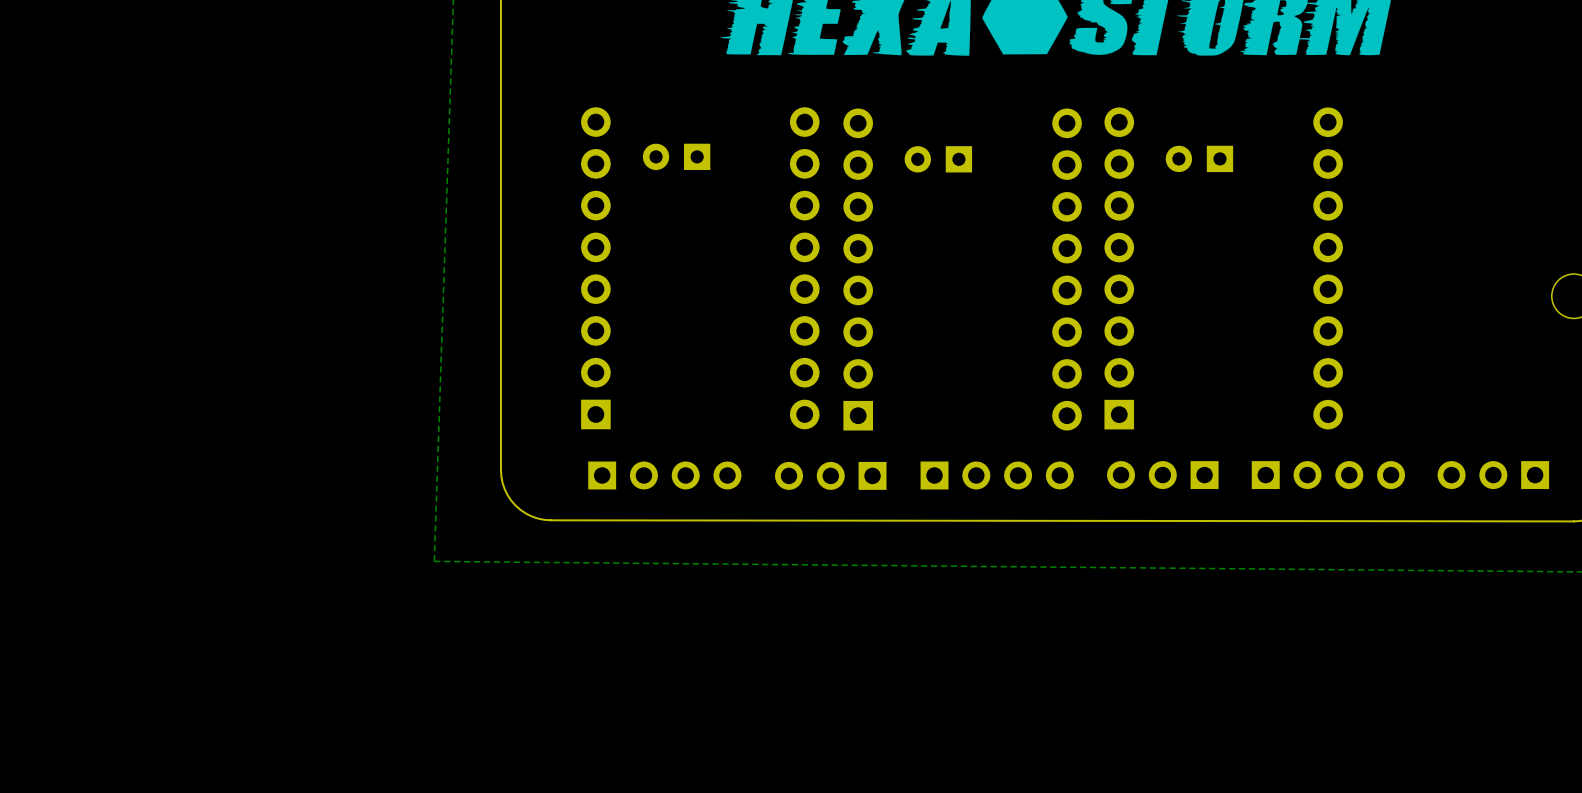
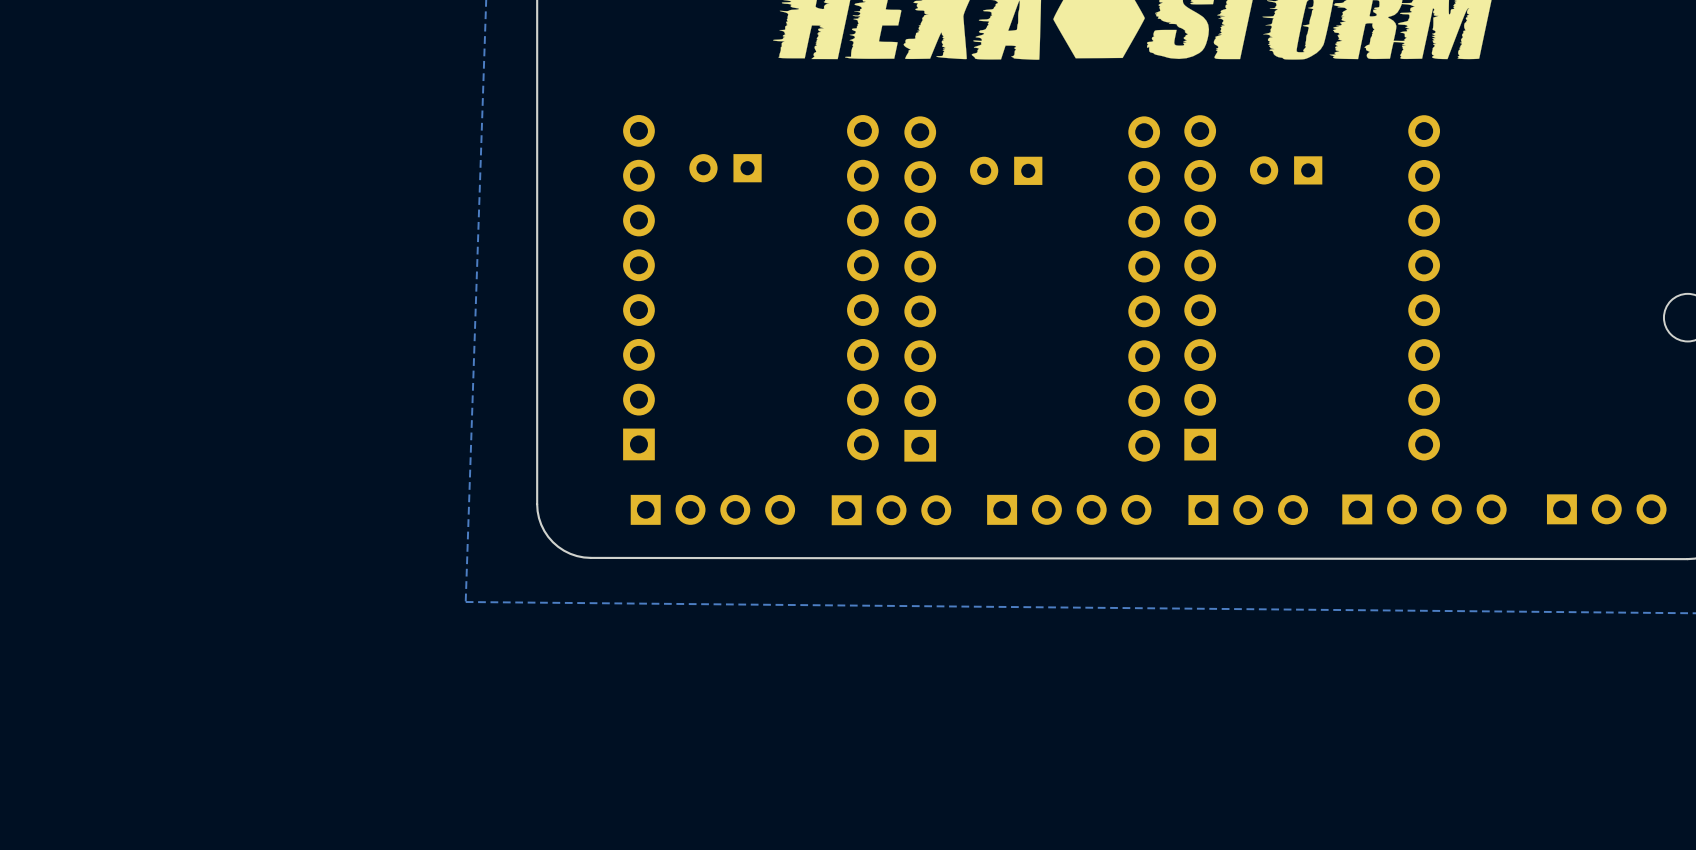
part rotation: 0° (830, 475) -> 180° (891, 510)
part rotation: 0° (1162, 475) -> 180° (1248, 510)
part rotation: 0° (1493, 475) -> 180° (1606, 509)

